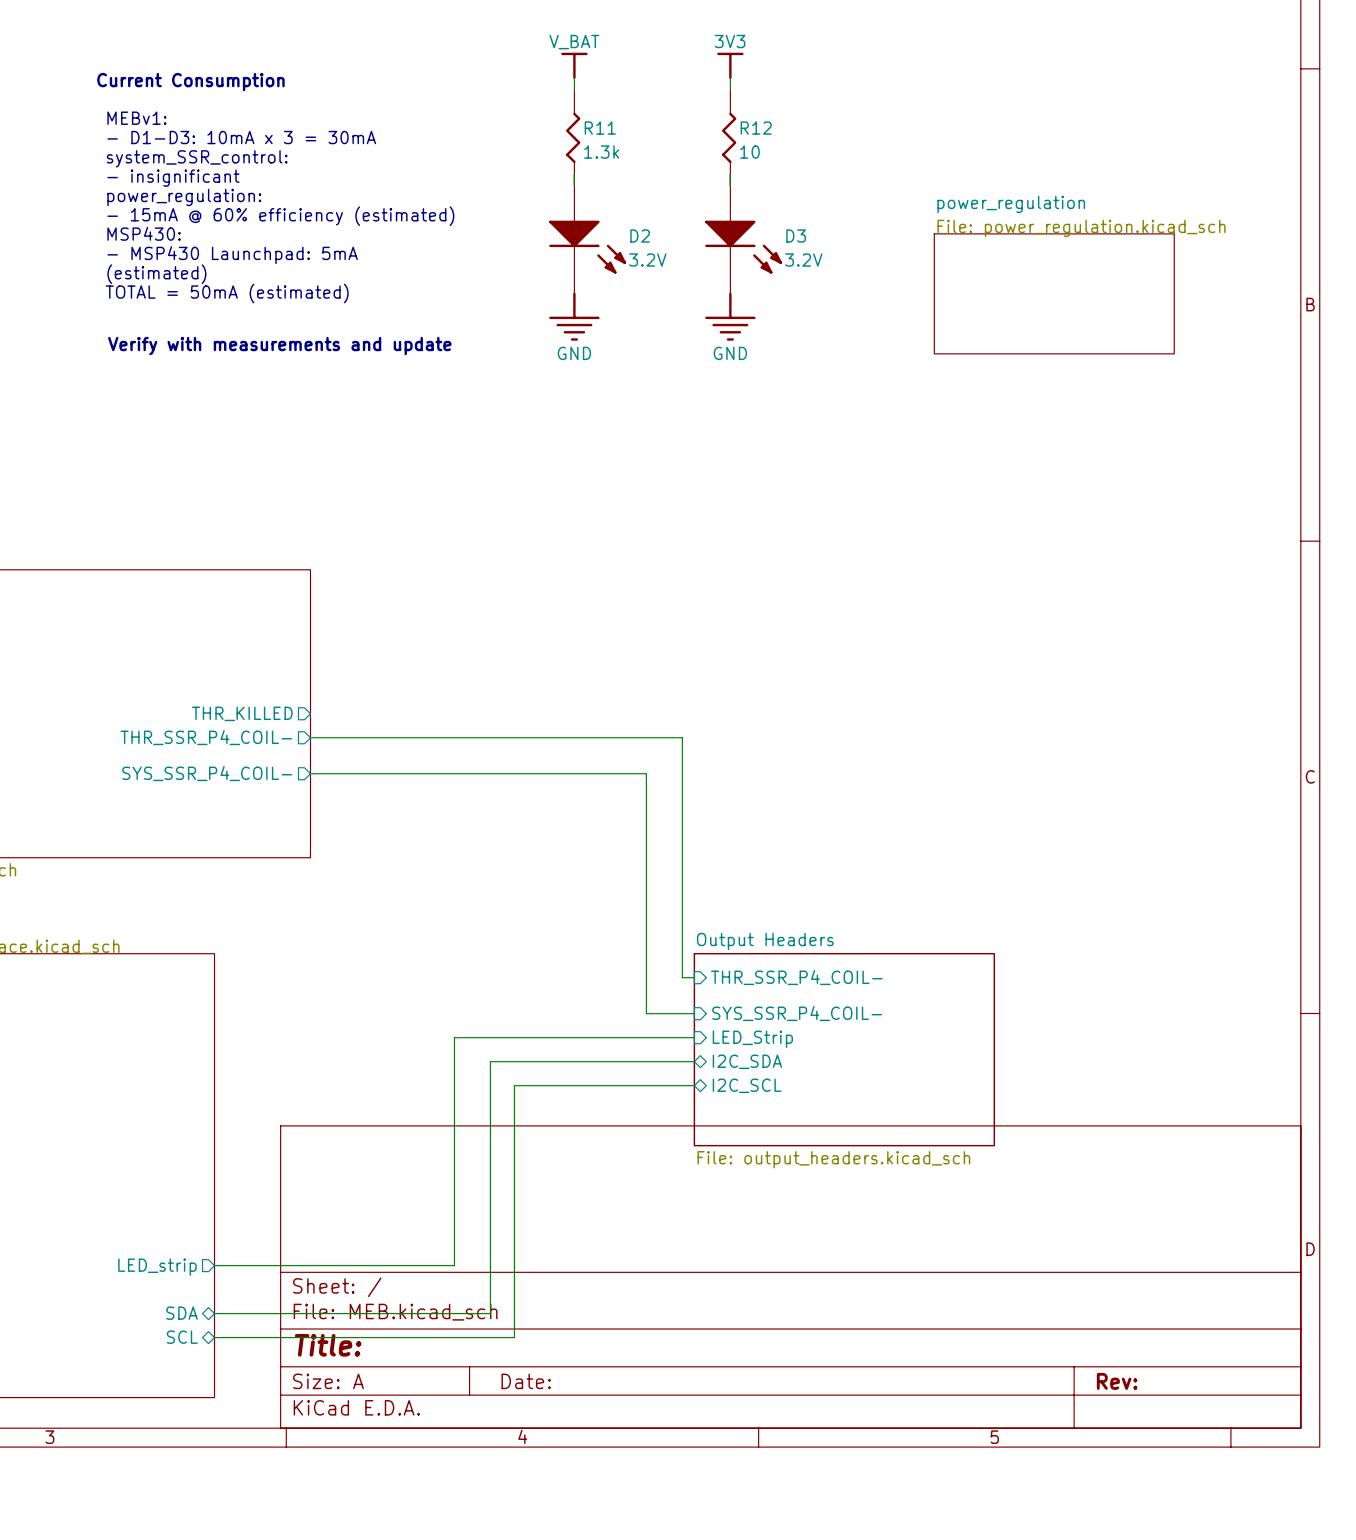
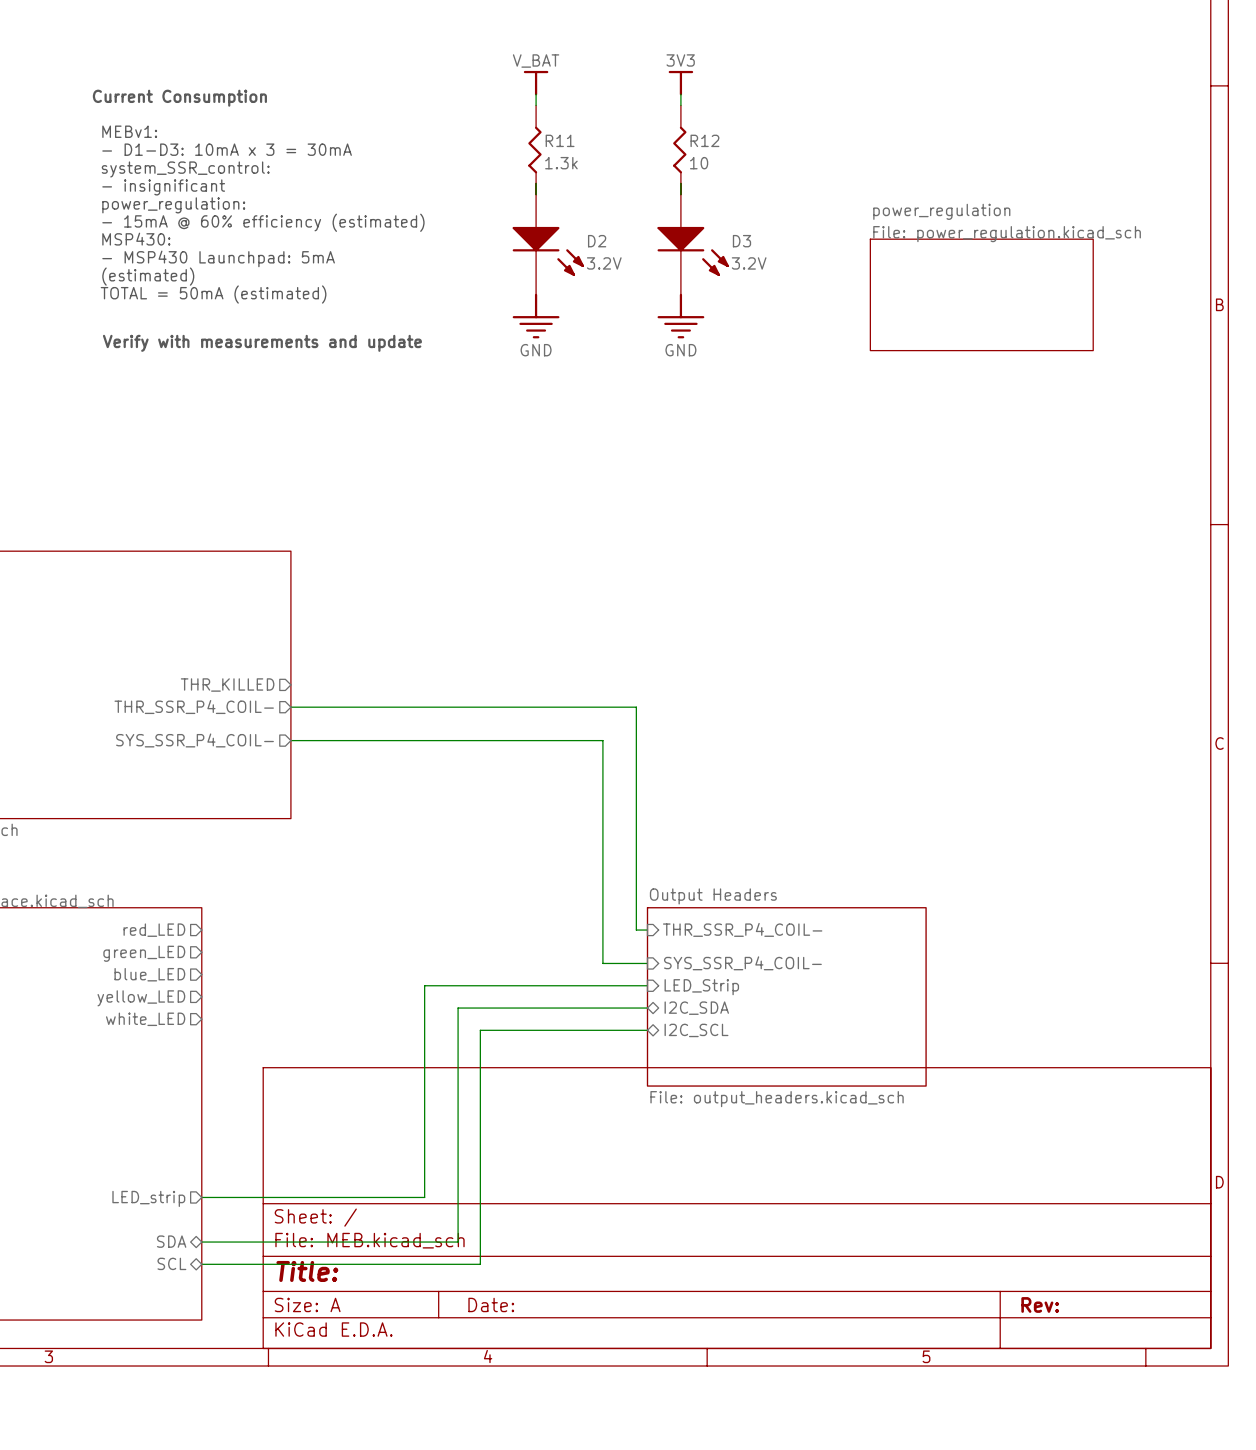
sheet pin: none -> red_LED (154, 930)
sheet pin: none -> green_LED (144, 953)
sheet pin: none -> blue_LED (149, 974)
sheet pin: none -> yellow_LED (141, 998)
sheet pin: none -> white_LED (145, 1019)

